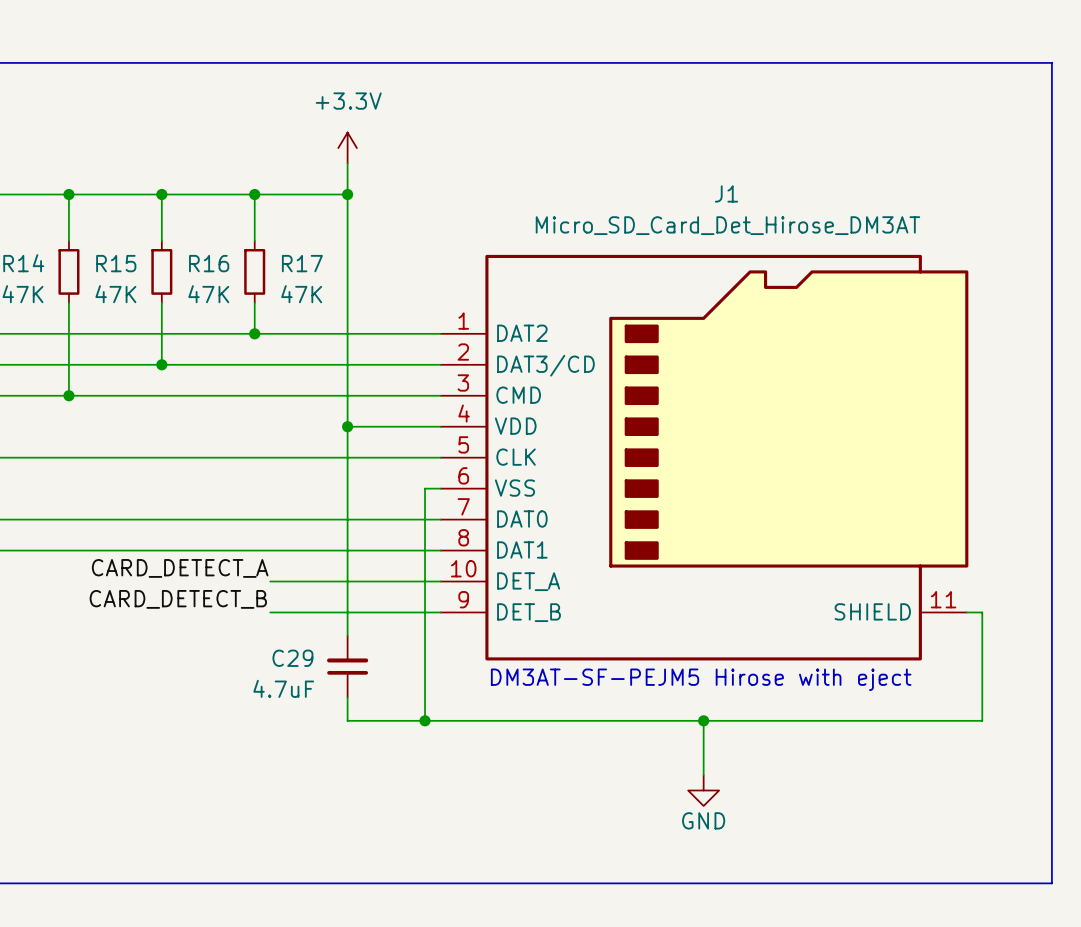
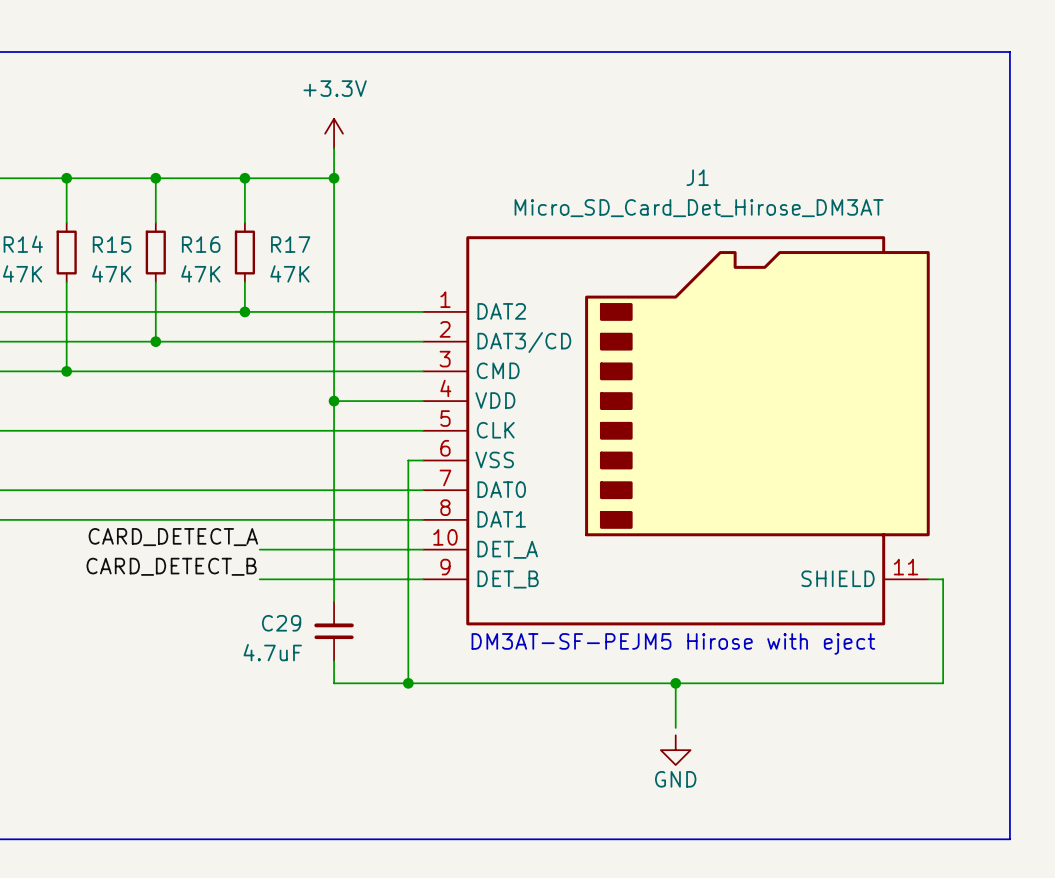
wire: (703, 767) (703, 775) -> none

